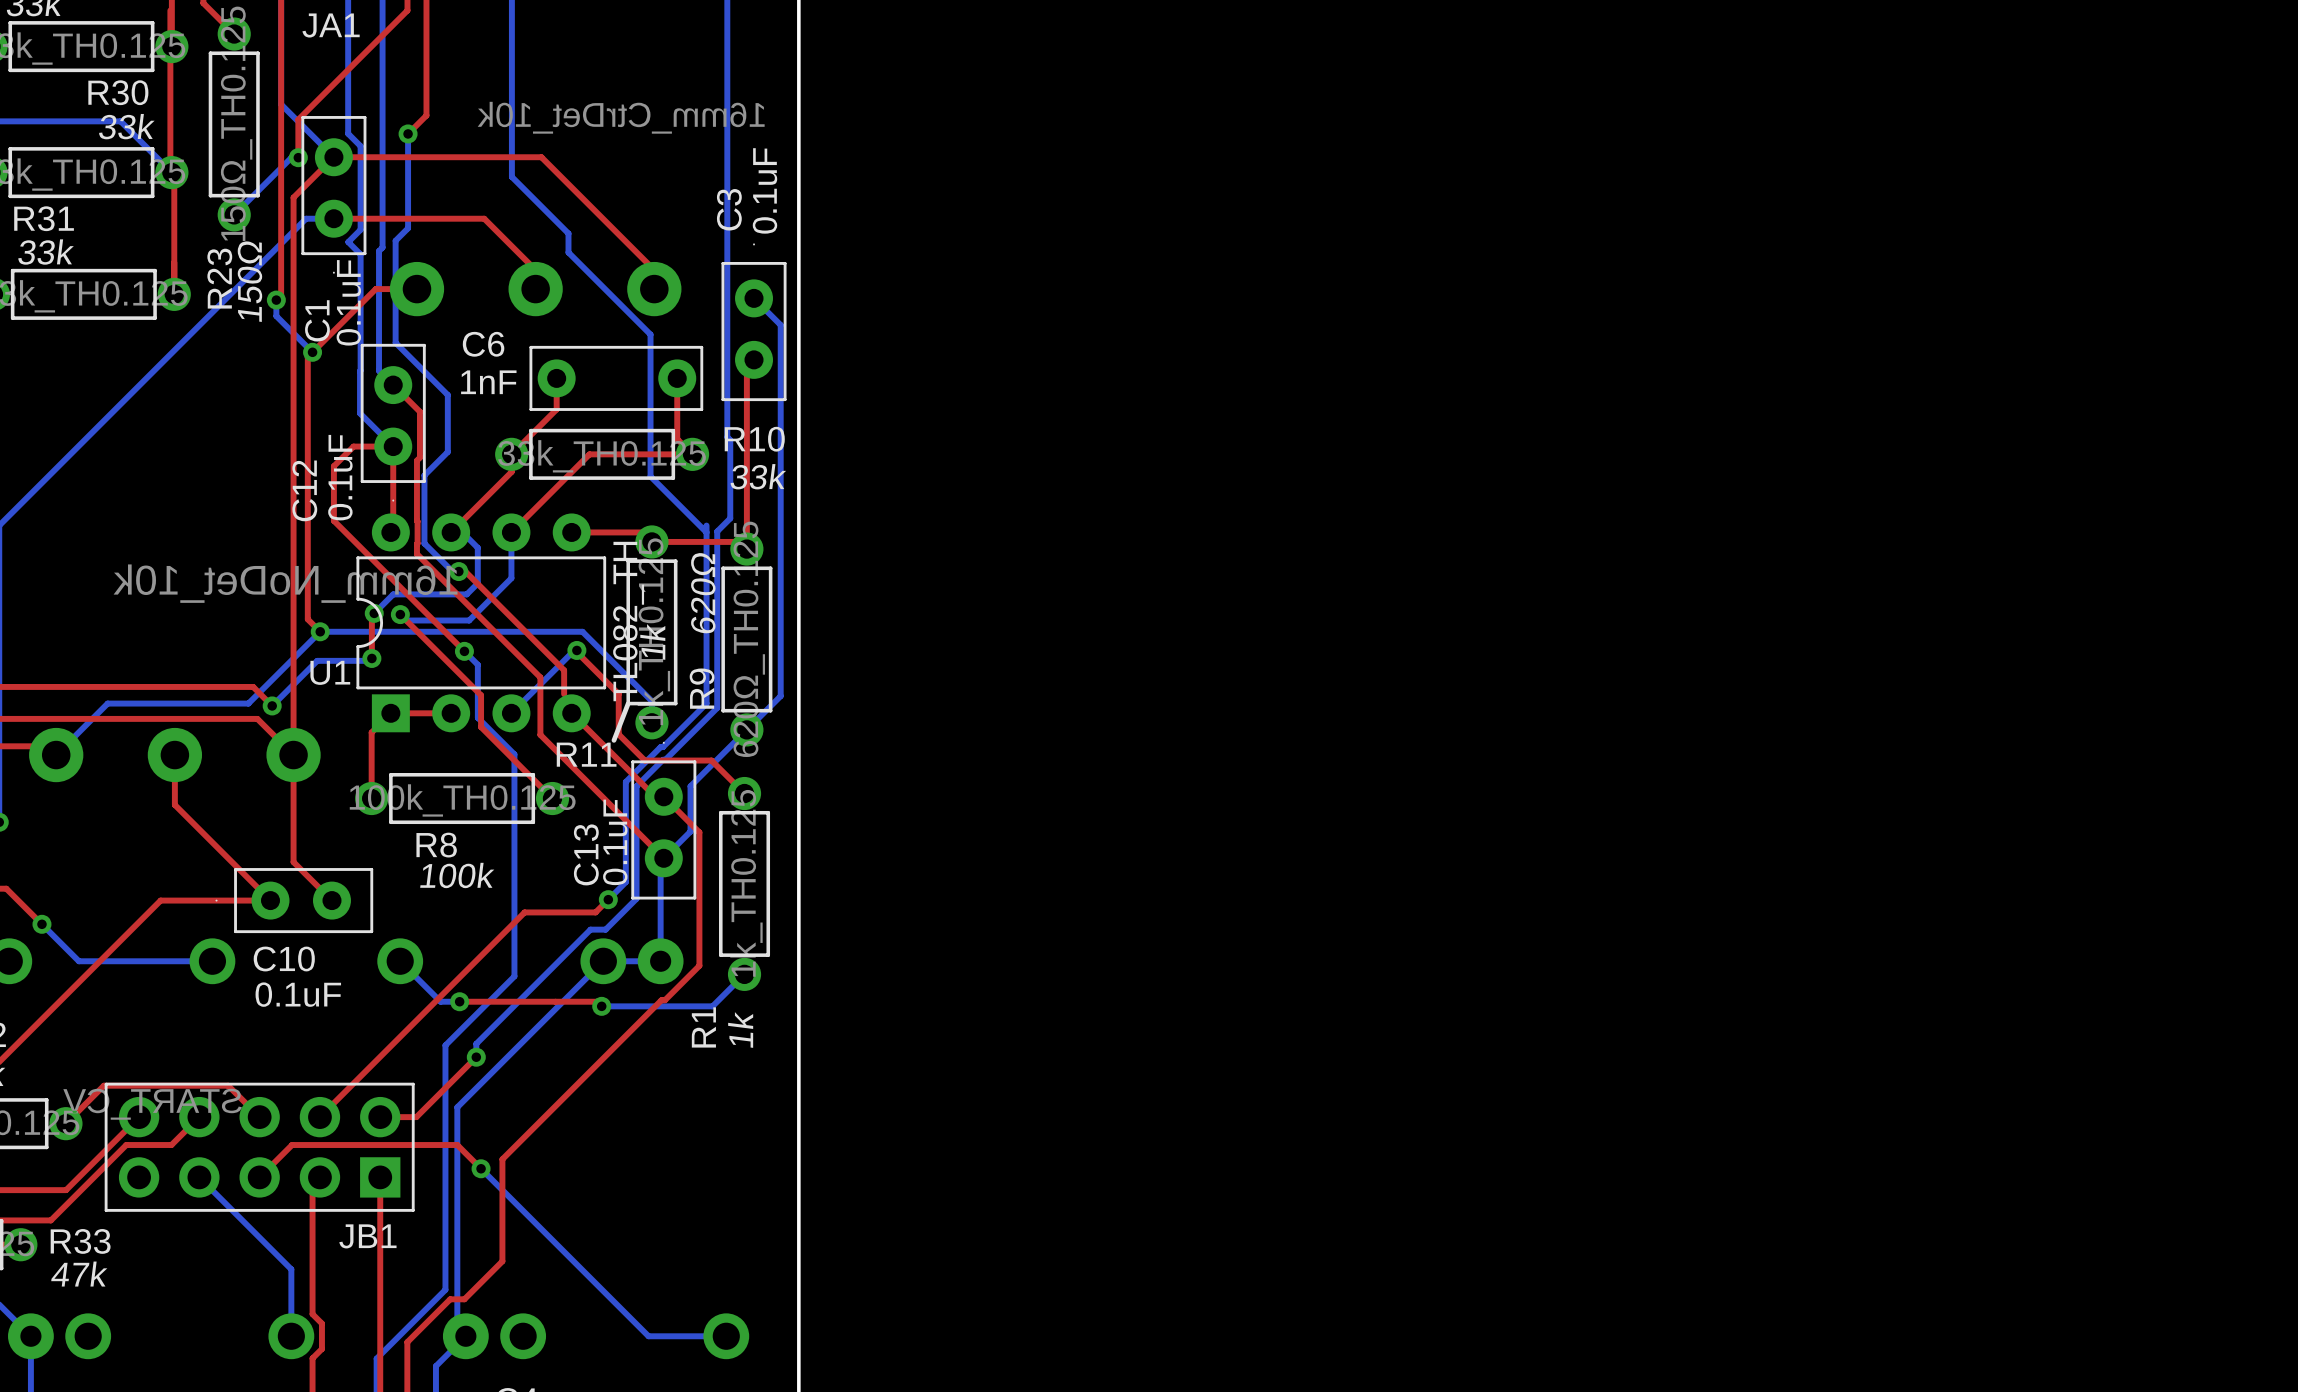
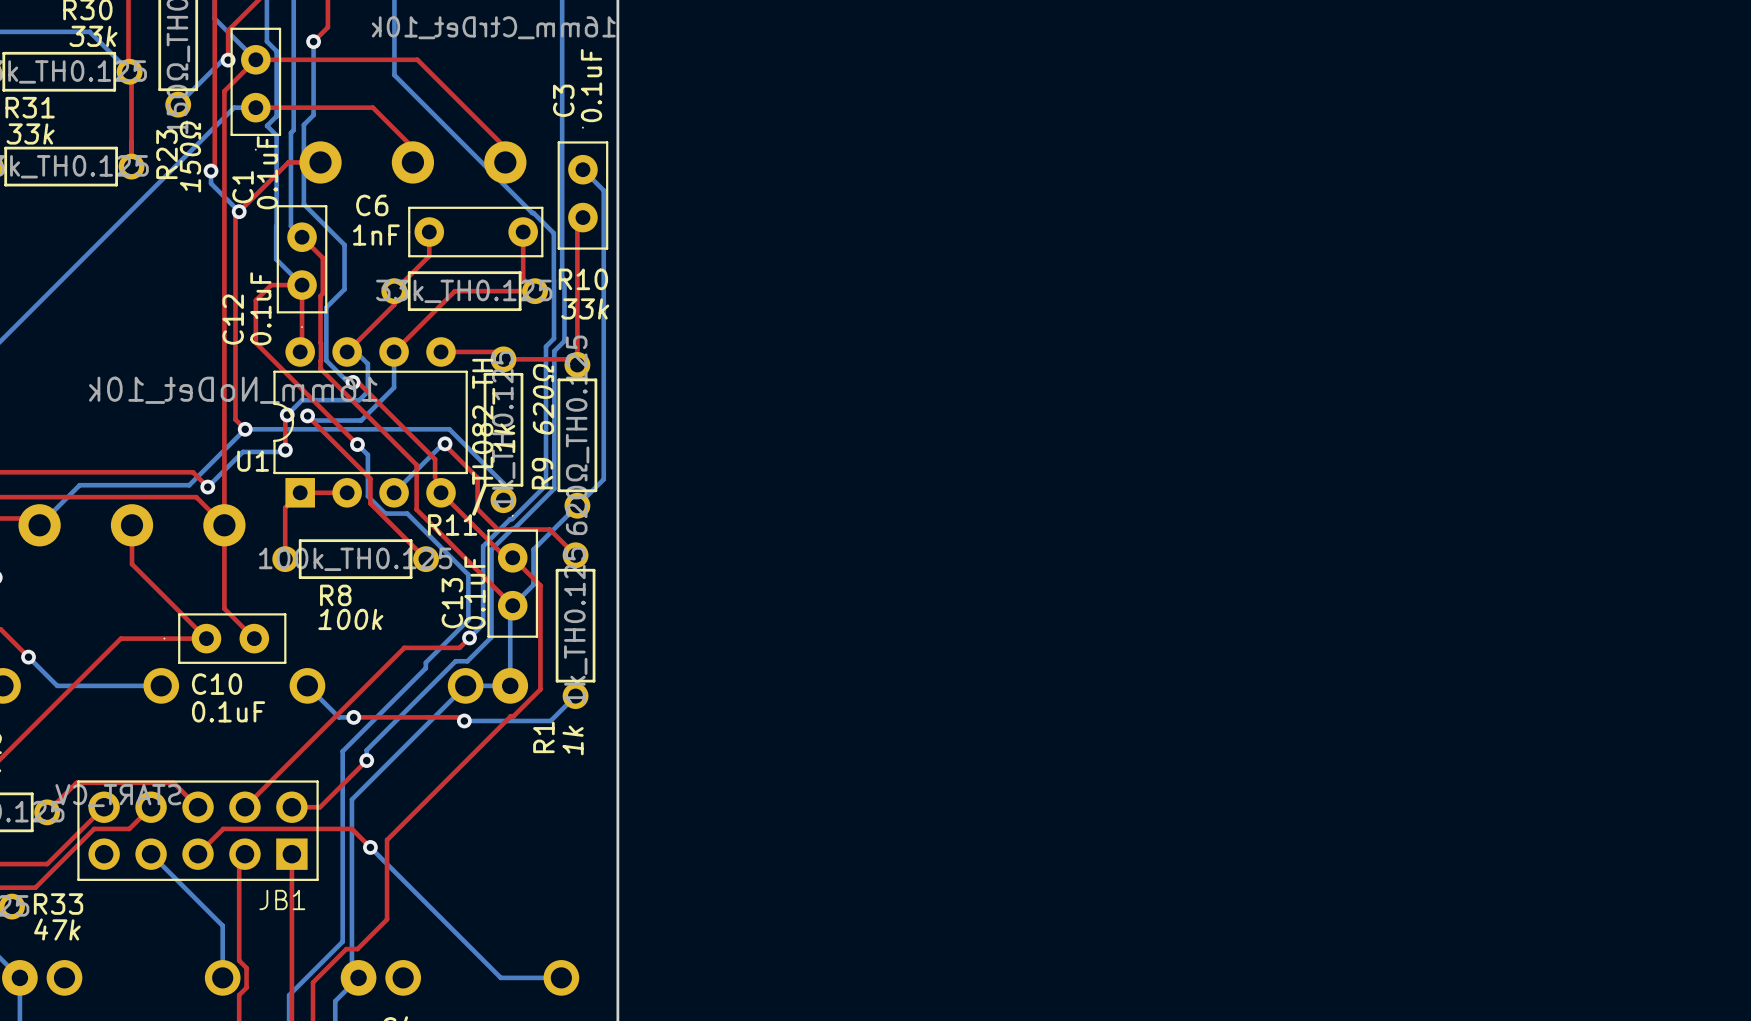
bottom track: (568, 233) (568, 252) (650, 334) (650, 476) (706, 532) -> (438, 119) (553, 233) (553, 281)
bottom track: none -> (554, 281) (554, 338) (545, 346)
bottom track: (500, 740) (514, 754) (514, 976) -> (385, 513) (407, 513) (468, 574) (468, 620) (425, 662) (425, 668) (396, 697)

